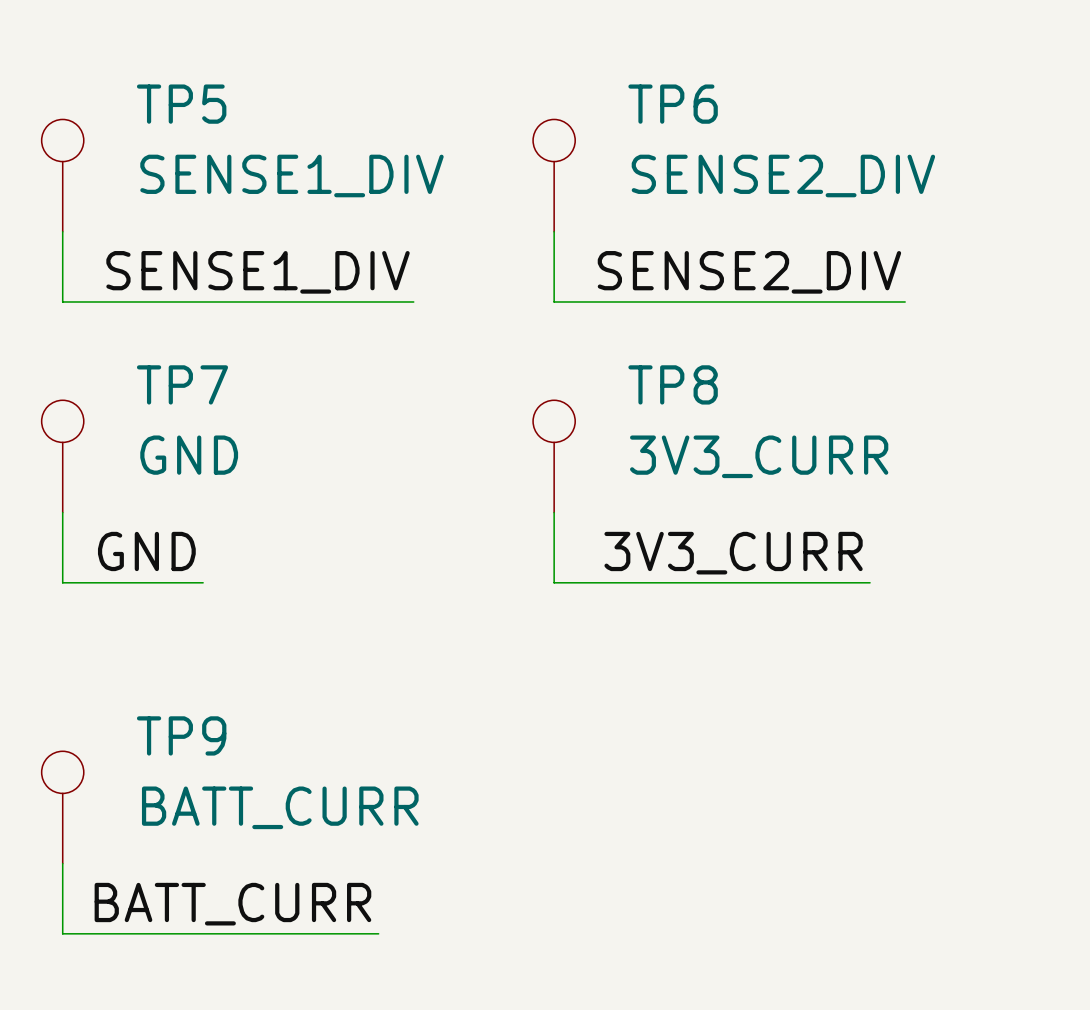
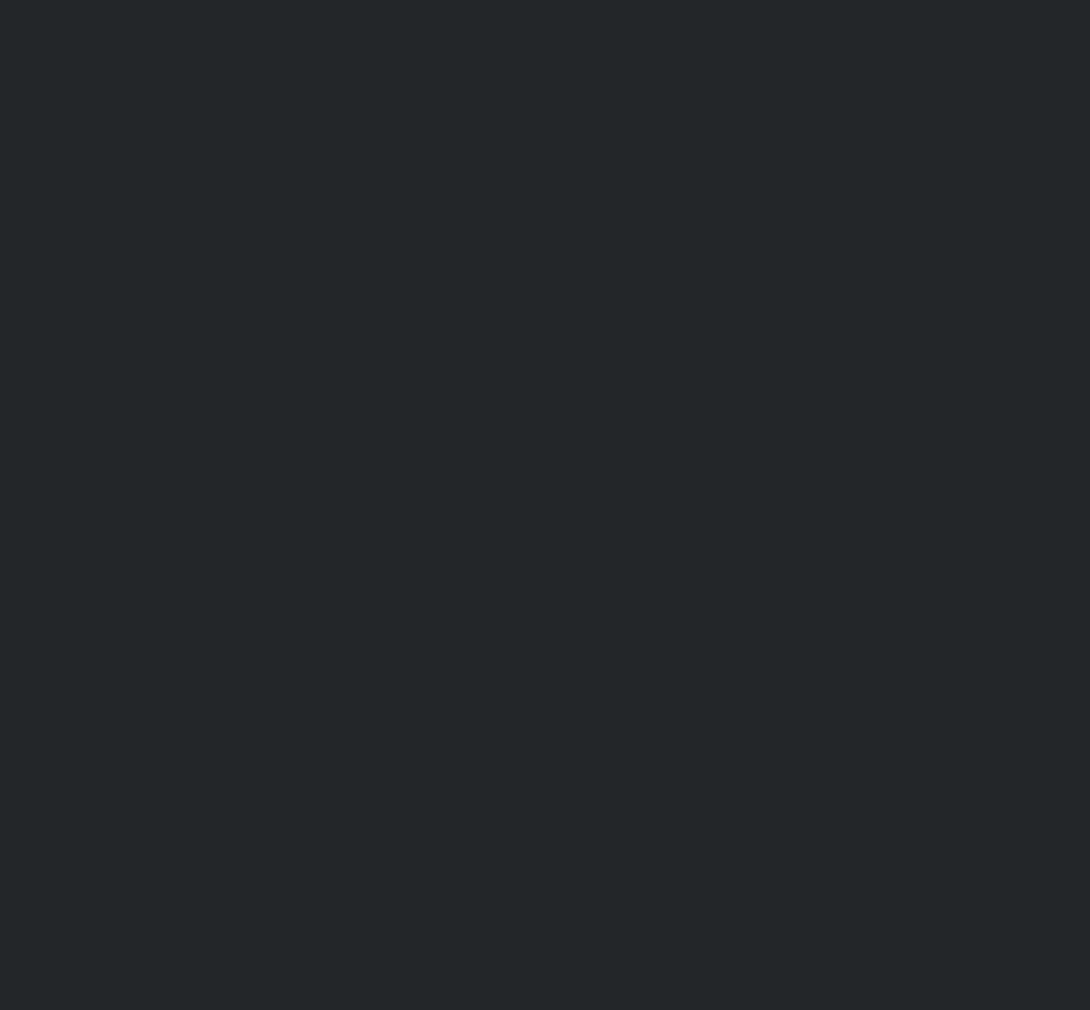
TP5: SENSE1_DIV (62, 175) -> none
TP6: SENSE2_DIV (554, 175) -> none
wire: (62, 231) (62, 301) (413, 301) -> none
wire: (554, 231) (554, 301) (905, 301) -> none
label: SENSE1_DIV (258, 272) -> none
label: SENSE2_DIV (749, 272) -> none
TP7: GND (62, 456) -> none
TP8: 3V3_CURR (554, 456) -> none
wire: (62, 512) (62, 582) (203, 582) -> none
wire: (554, 512) (554, 582) (870, 582) -> none
label: GND (146, 551) -> none
label: 3V3_CURR (733, 553) -> none
TP9: BATT_CURR (62, 807) -> none
wire: (62, 863) (62, 933) (378, 933) -> none
label: BATT_CURR (232, 904) -> none

